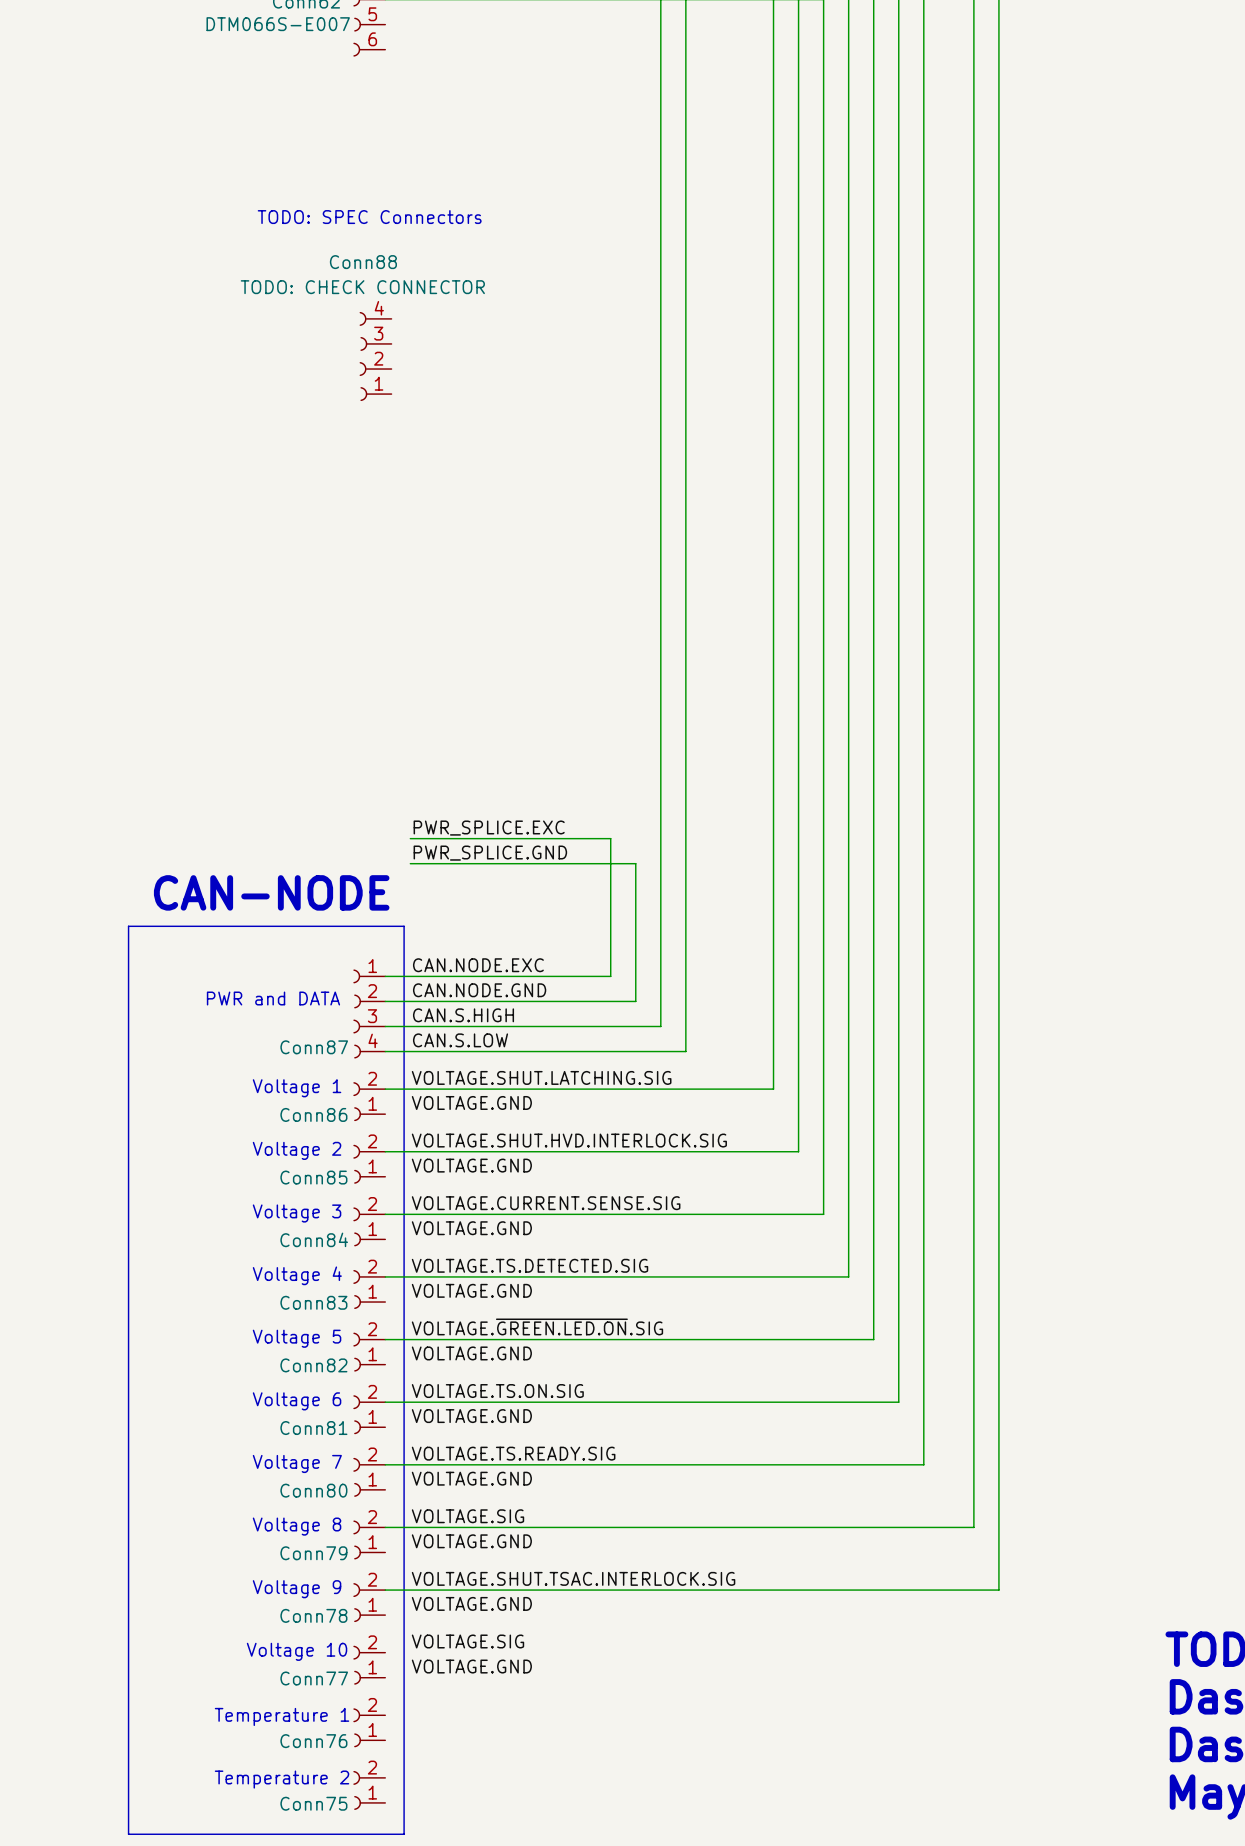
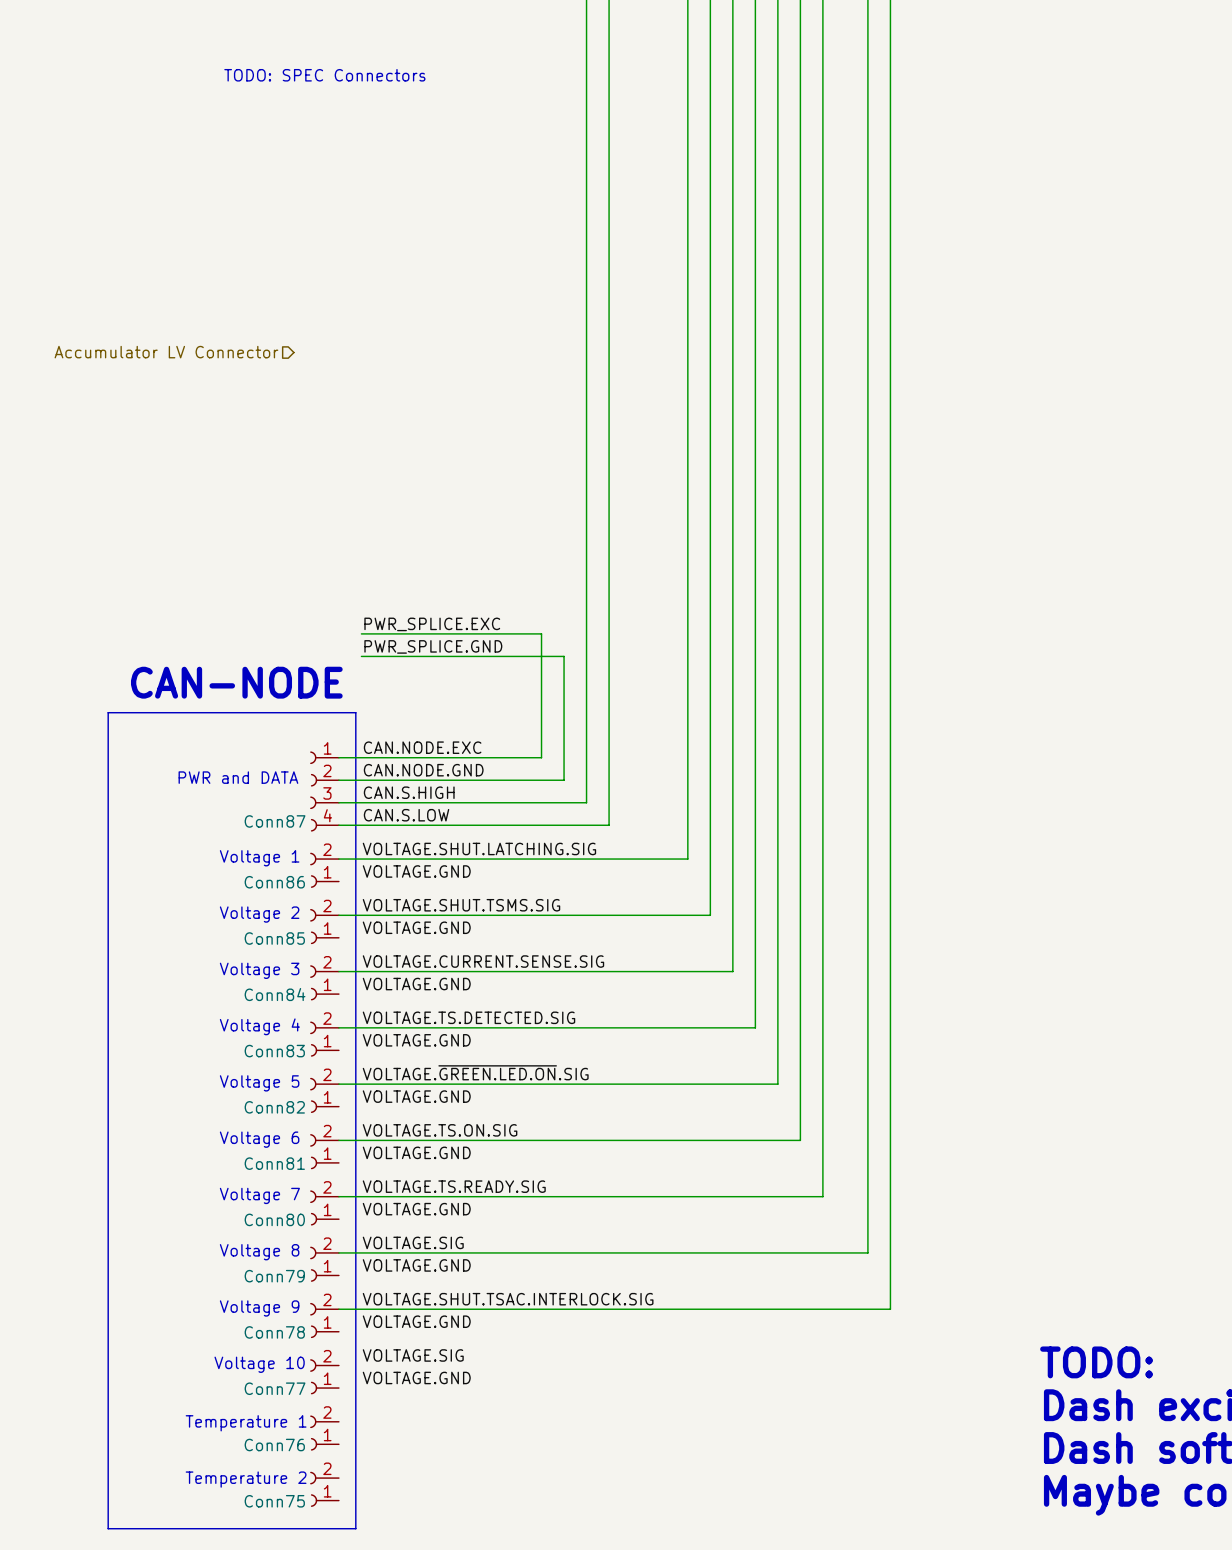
Conn88: TODO: CHECK CONNECTOR (375, 356) -> none
hierarchical label: none -> Accumulator LV Connector (166, 352)
label: VOLTAGE.SHUT.HVD.INTERLOCK.SIG (569, 1140) -> VOLTAGE.SHUT.TSMS.SIG (461, 905)

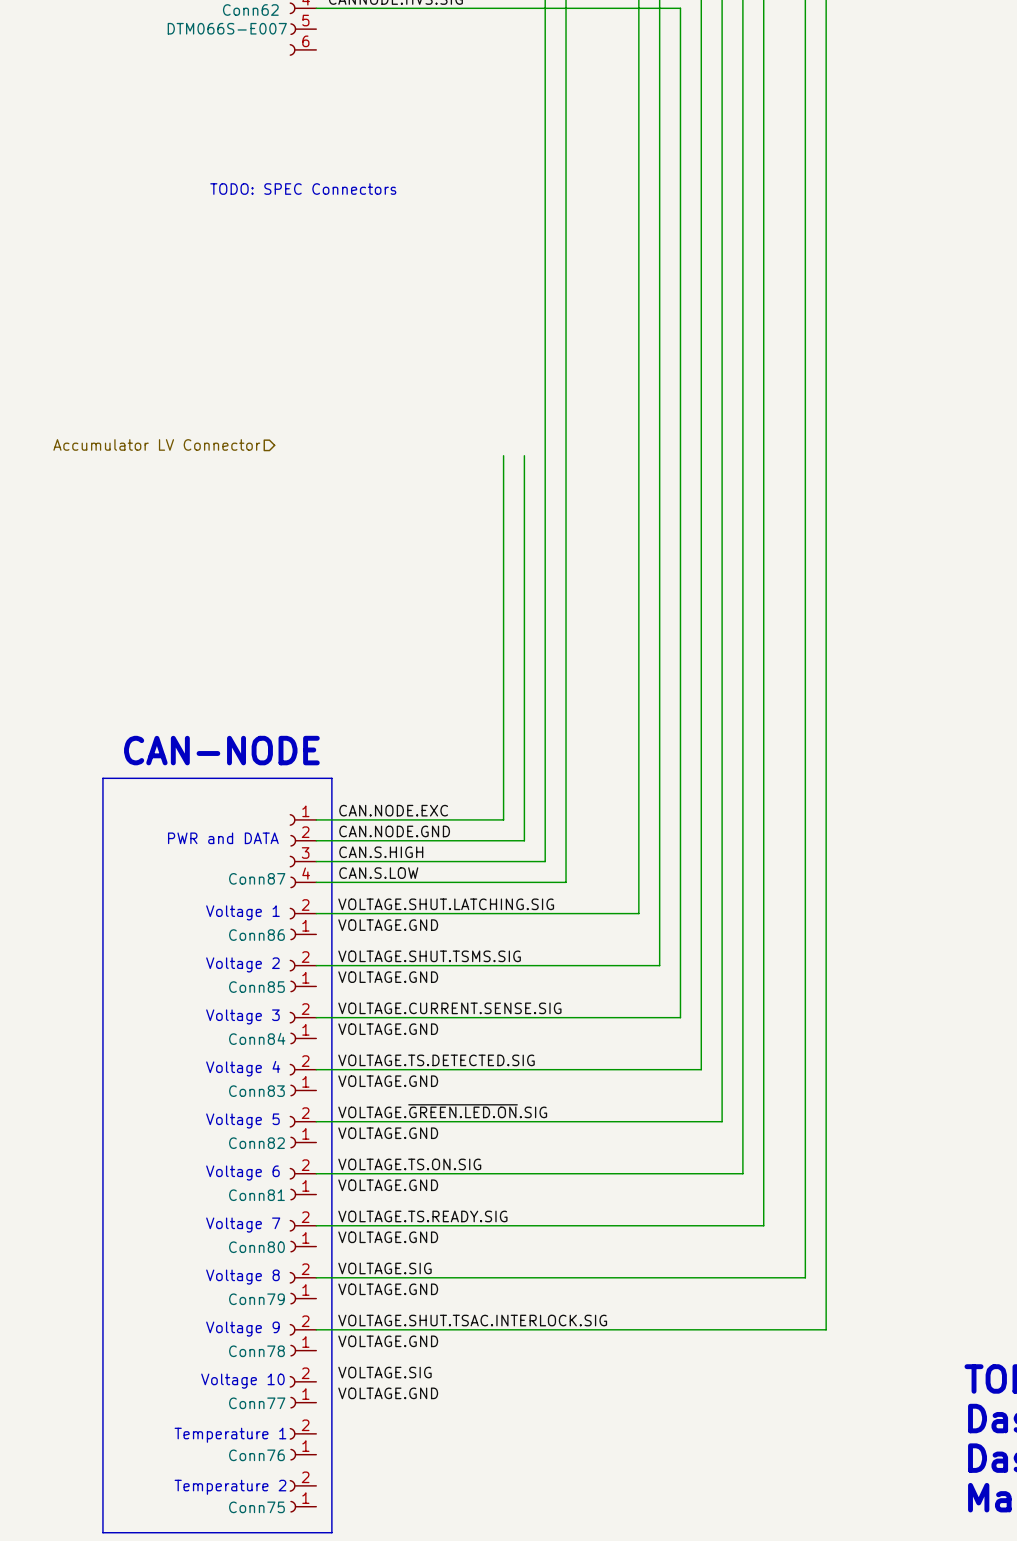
label: PWR_SPLICE.EXC (432, 624) -> none
wire: (361, 633) (541, 633) -> (503, 455) (503, 705)
label: PWR_SPLICE.GND (433, 646) -> none
wire: (361, 656) (564, 656) -> (524, 455) (524, 726)

